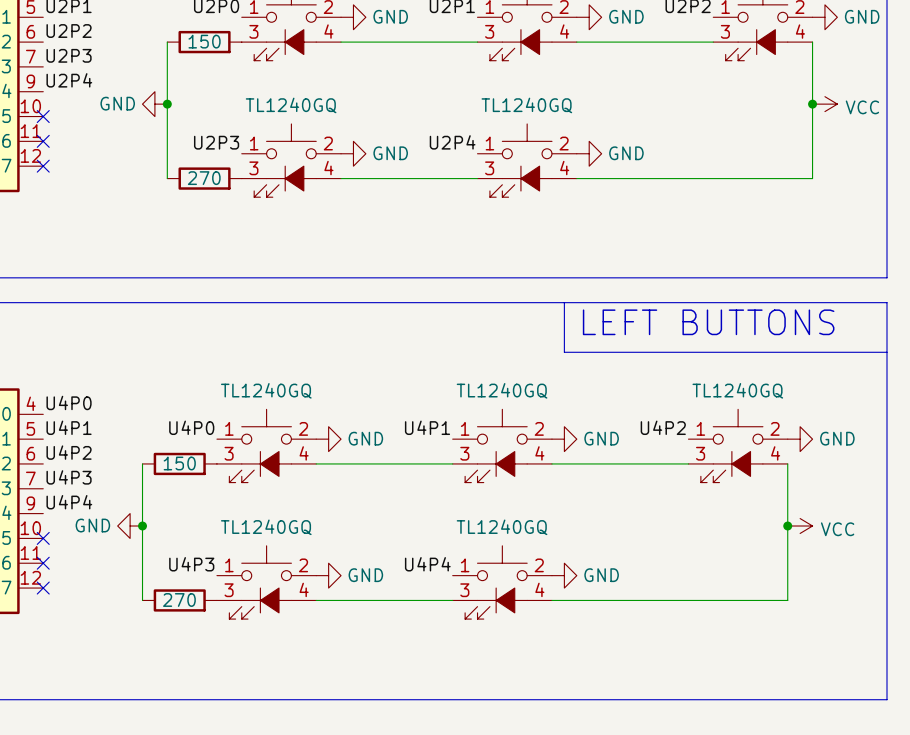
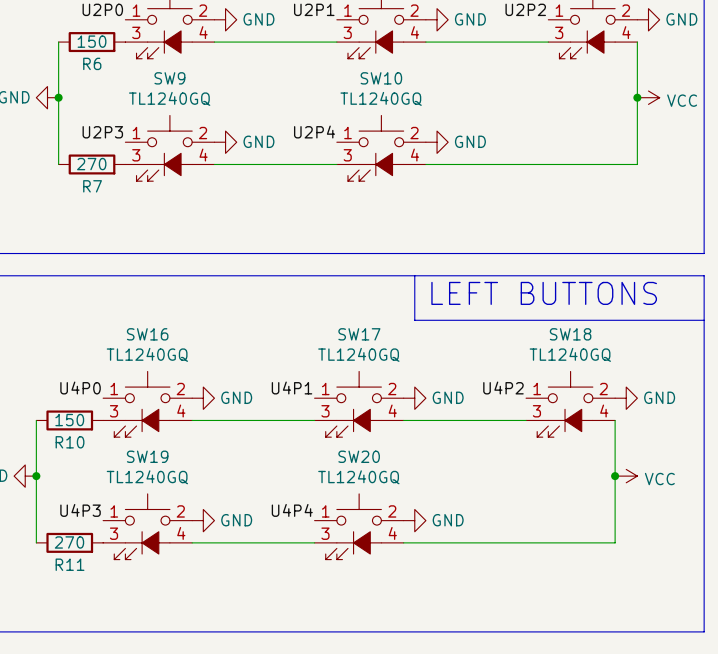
R6 name: none -> R6 (92, 63)
SW9 name: none -> SW9 (169, 78)
SW10 name: none -> SW10 (381, 78)
R7 name: none -> R7 (92, 186)
SW16 name: none -> SW16 (147, 334)
SW17 name: none -> SW17 (359, 334)
SW18 name: none -> SW18 (570, 334)
R10 name: none -> R10 (70, 442)
SW19 name: none -> SW19 (147, 456)
SW20 name: none -> SW20 (359, 456)
R11 name: none -> R11 (70, 564)

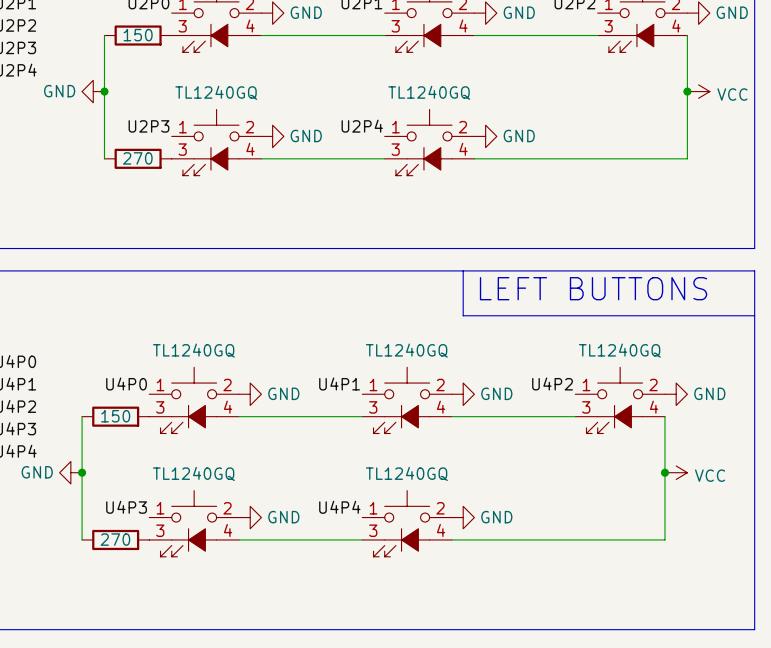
R6 name: R6 (92, 63) -> none
SW9 name: SW9 (169, 78) -> none
SW10 name: SW10 (381, 78) -> none
R7 name: R7 (92, 186) -> none
SW16 name: SW16 (147, 334) -> none
SW17 name: SW17 (359, 334) -> none
SW18 name: SW18 (570, 334) -> none
R10 name: R10 (70, 442) -> none
SW19 name: SW19 (147, 456) -> none
SW20 name: SW20 (359, 456) -> none
R11 name: R11 (70, 564) -> none

